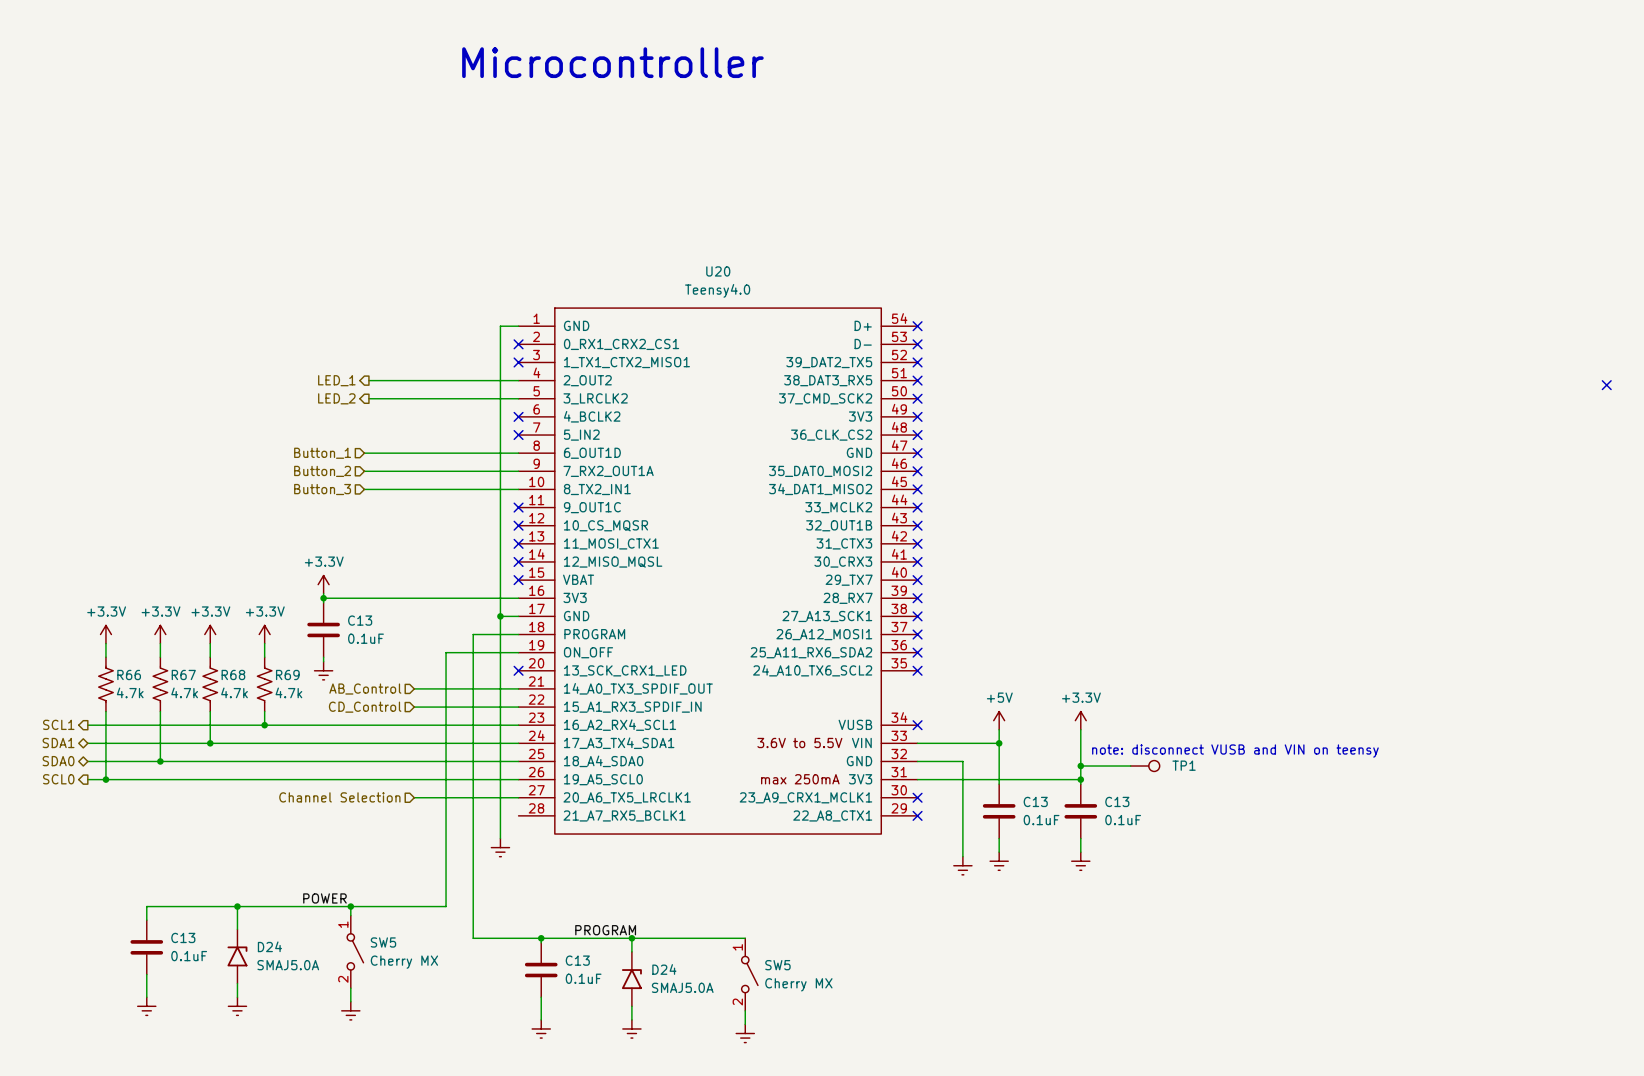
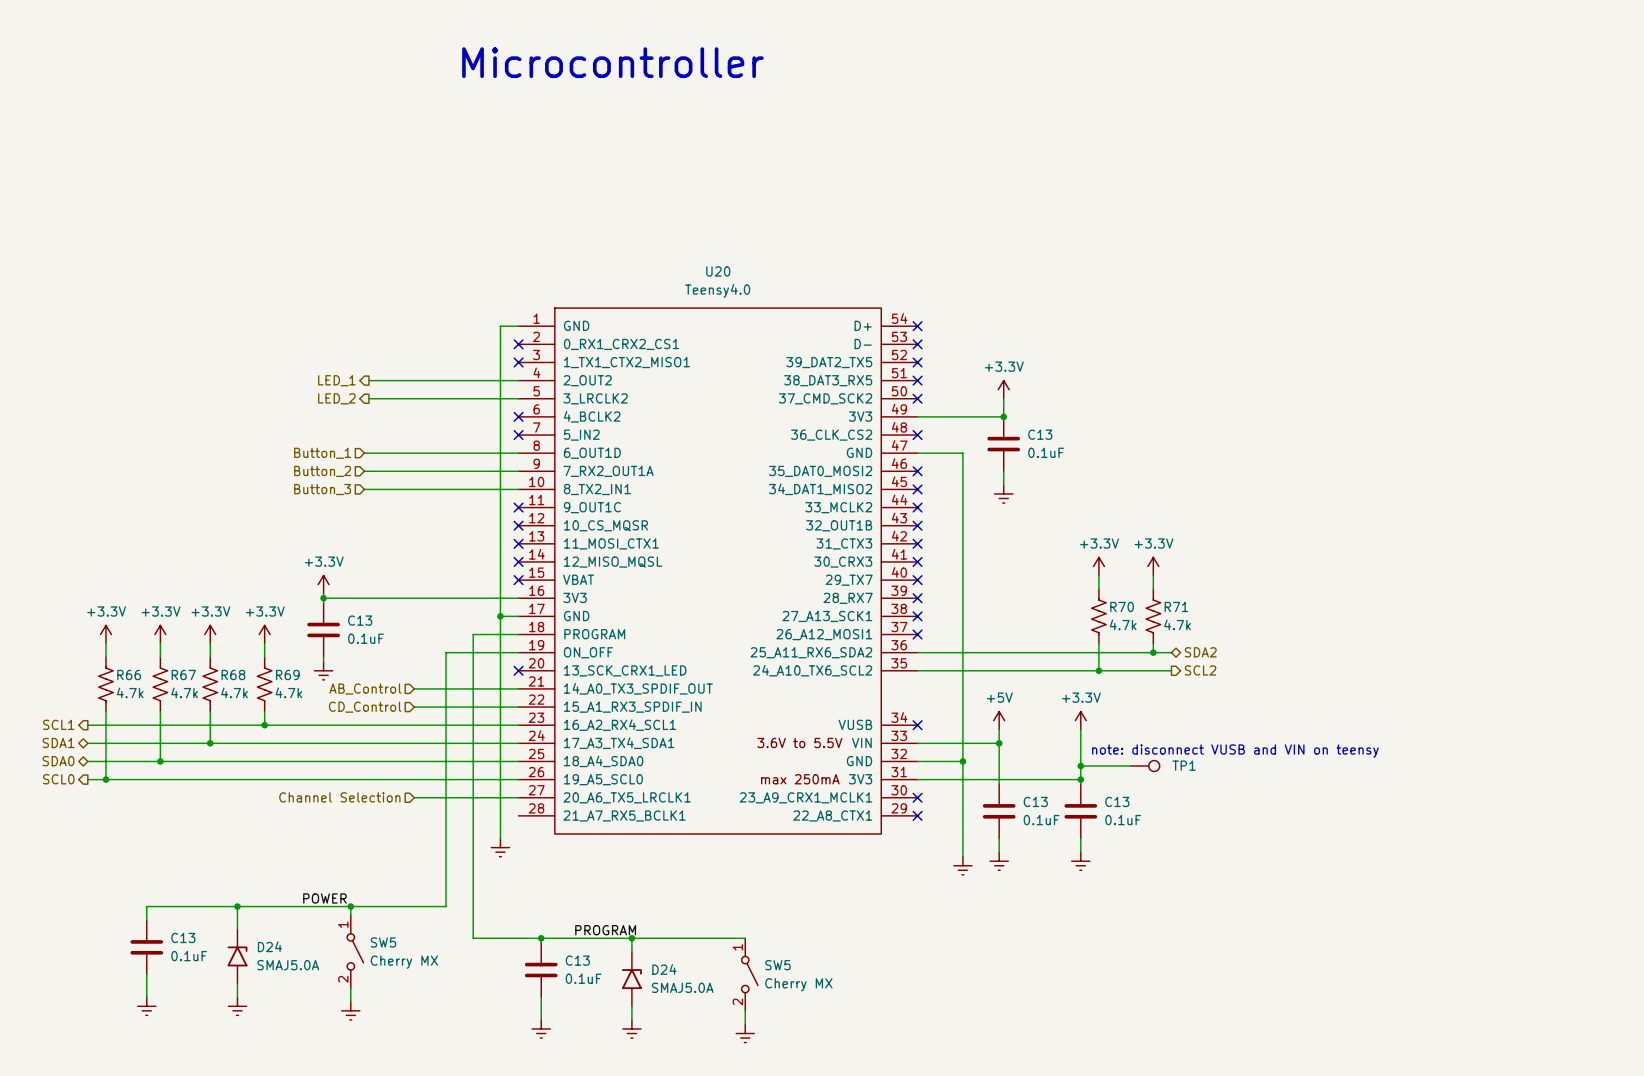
no-connect mark: (1606, 385) -> none
power symbol: none -> +3.3V (1003, 389)
wire: none -> (1003, 398) (1003, 416) (917, 416)
no-connect mark: (917, 416) -> none
junction: none -> (1003, 416)
C13: none -> 0.1uF (1003, 444)
wire: none -> (917, 453) (962, 453) (962, 761)
no-connect mark: (917, 453) -> none
wire: none -> (1003, 471) (1003, 484)
power symbol: none -> (1003, 493)
power symbol: none -> +3.3V (1098, 566)
power symbol: none -> +3.3V (1153, 566)
wire: none -> (1098, 575) (1098, 589)
wire: none -> (1153, 575) (1153, 589)
R70: none -> 4.7k (1098, 616)
R71: none -> 4.7k (1153, 616)
wire: none -> (1098, 643) (1098, 670)
wire: none -> (1153, 643) (1153, 652)
wire: none -> (917, 652) (1171, 652)
no-connect mark: (917, 652) -> none
junction: none -> (1153, 652)
hierarchical label: none -> SDA2 (1200, 652)
wire: none -> (917, 670) (1171, 670)
no-connect mark: (917, 670) -> none
junction: none -> (1098, 670)
hierarchical label: none -> SCL2 (1200, 670)
junction: none -> (962, 761)

